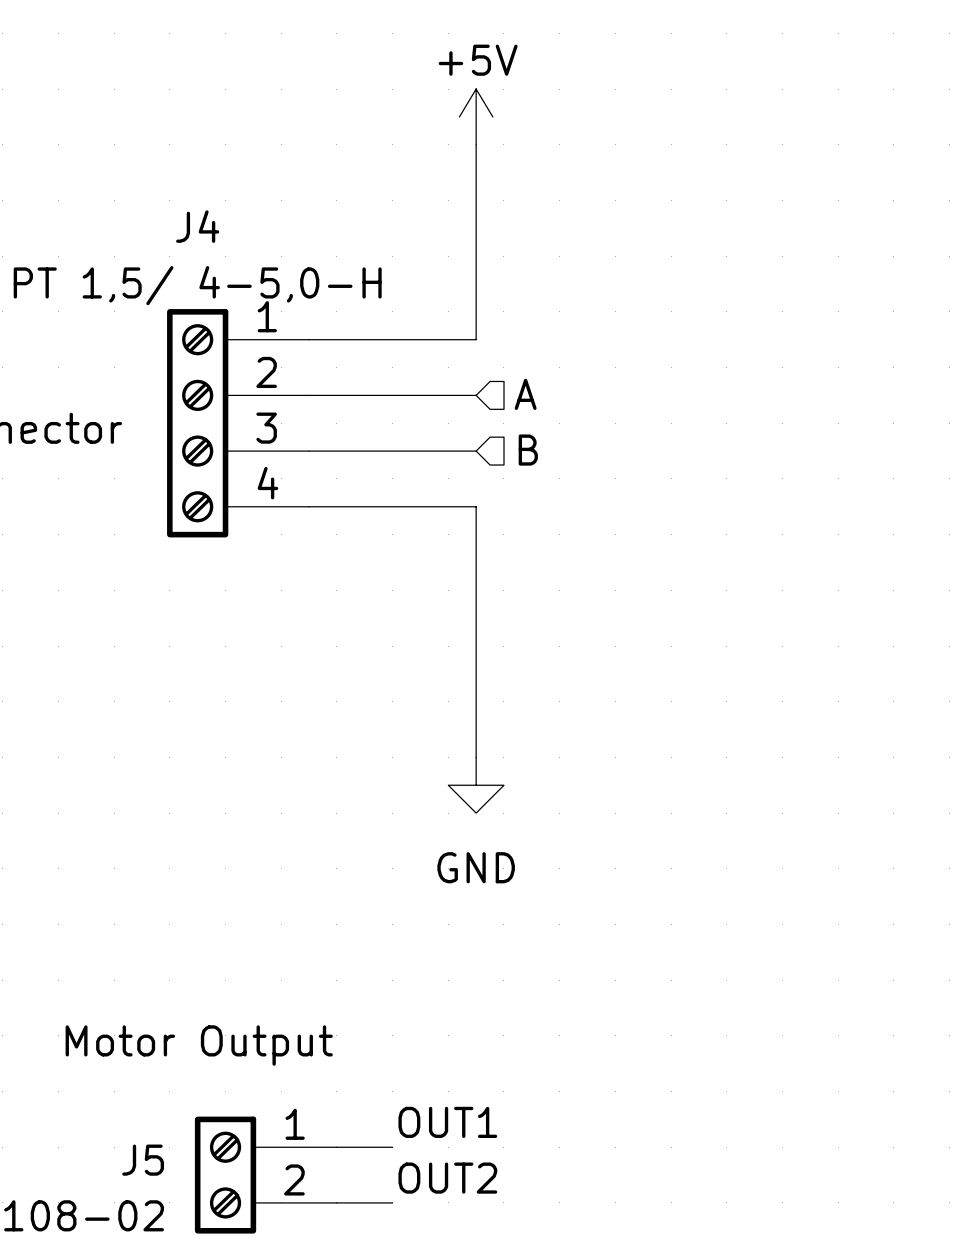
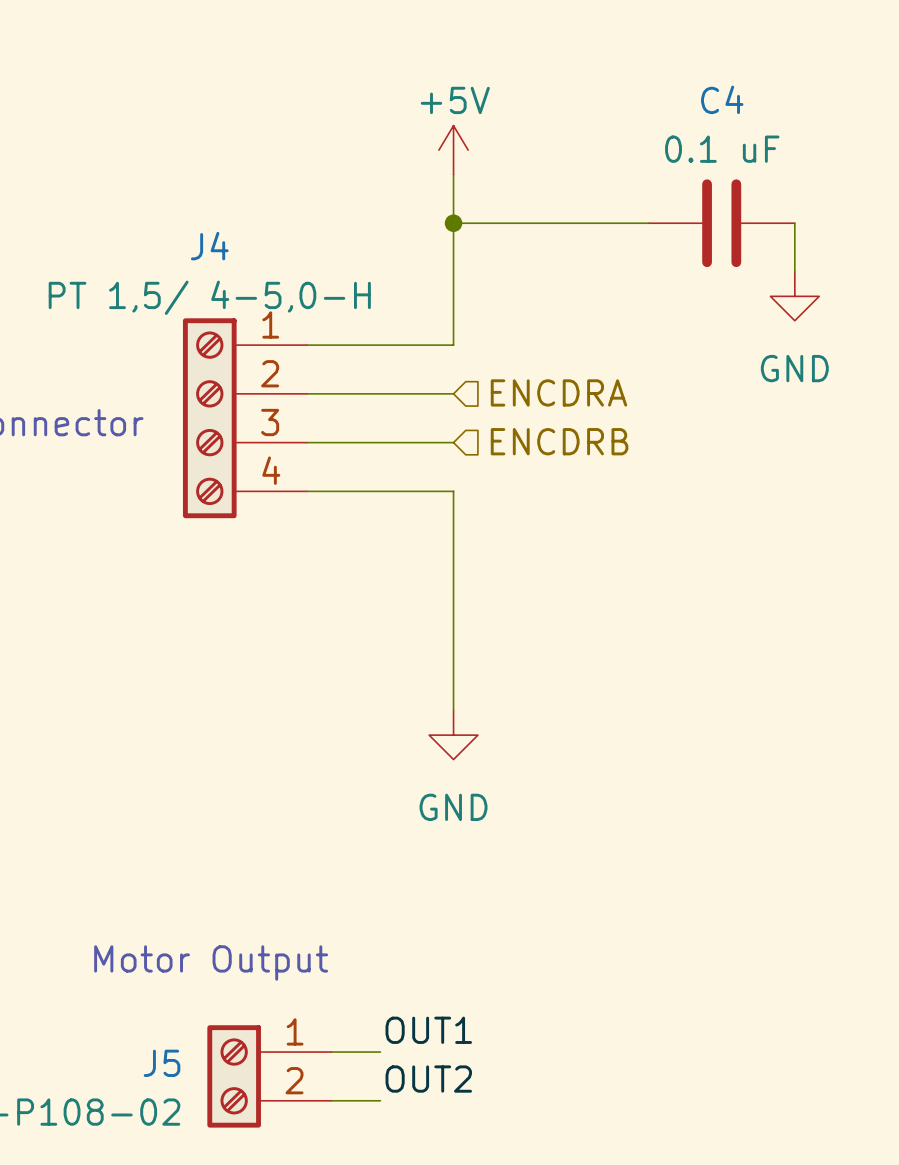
wire: none -> (453, 223) (648, 223)
junction: none -> (453, 223)
C4: none -> 0.1 uF (721, 223)
wire: none -> (794, 223) (794, 271)
power symbol: none -> GND (794, 296)
hierarchical label: A (525, 394) -> ENCDRA (558, 392)
hierarchical label: B (528, 450) -> ENCDRB (559, 441)

